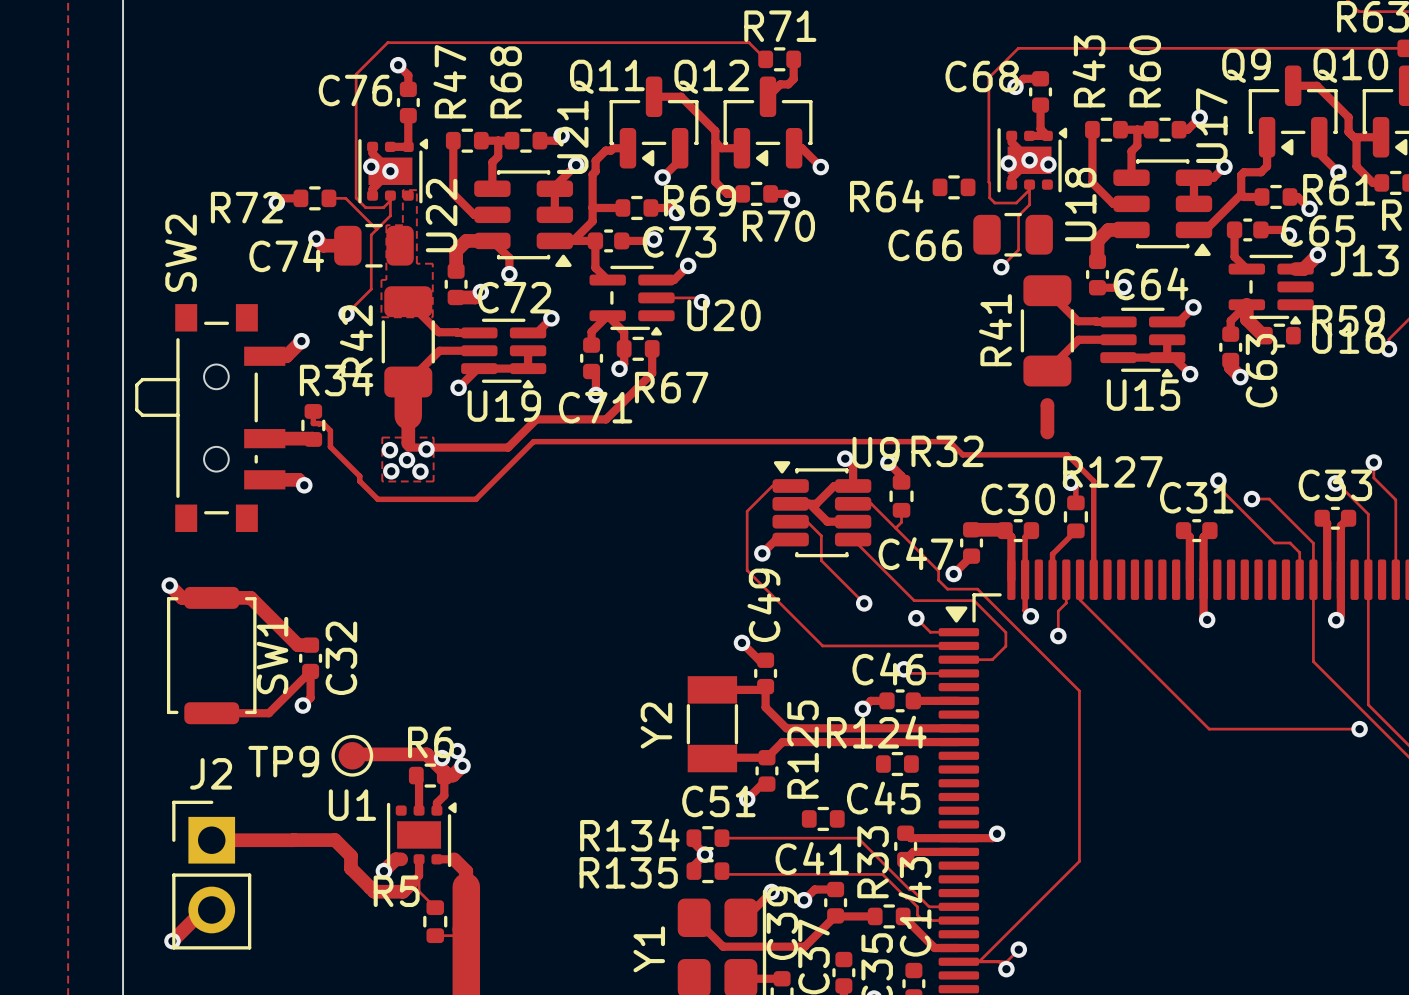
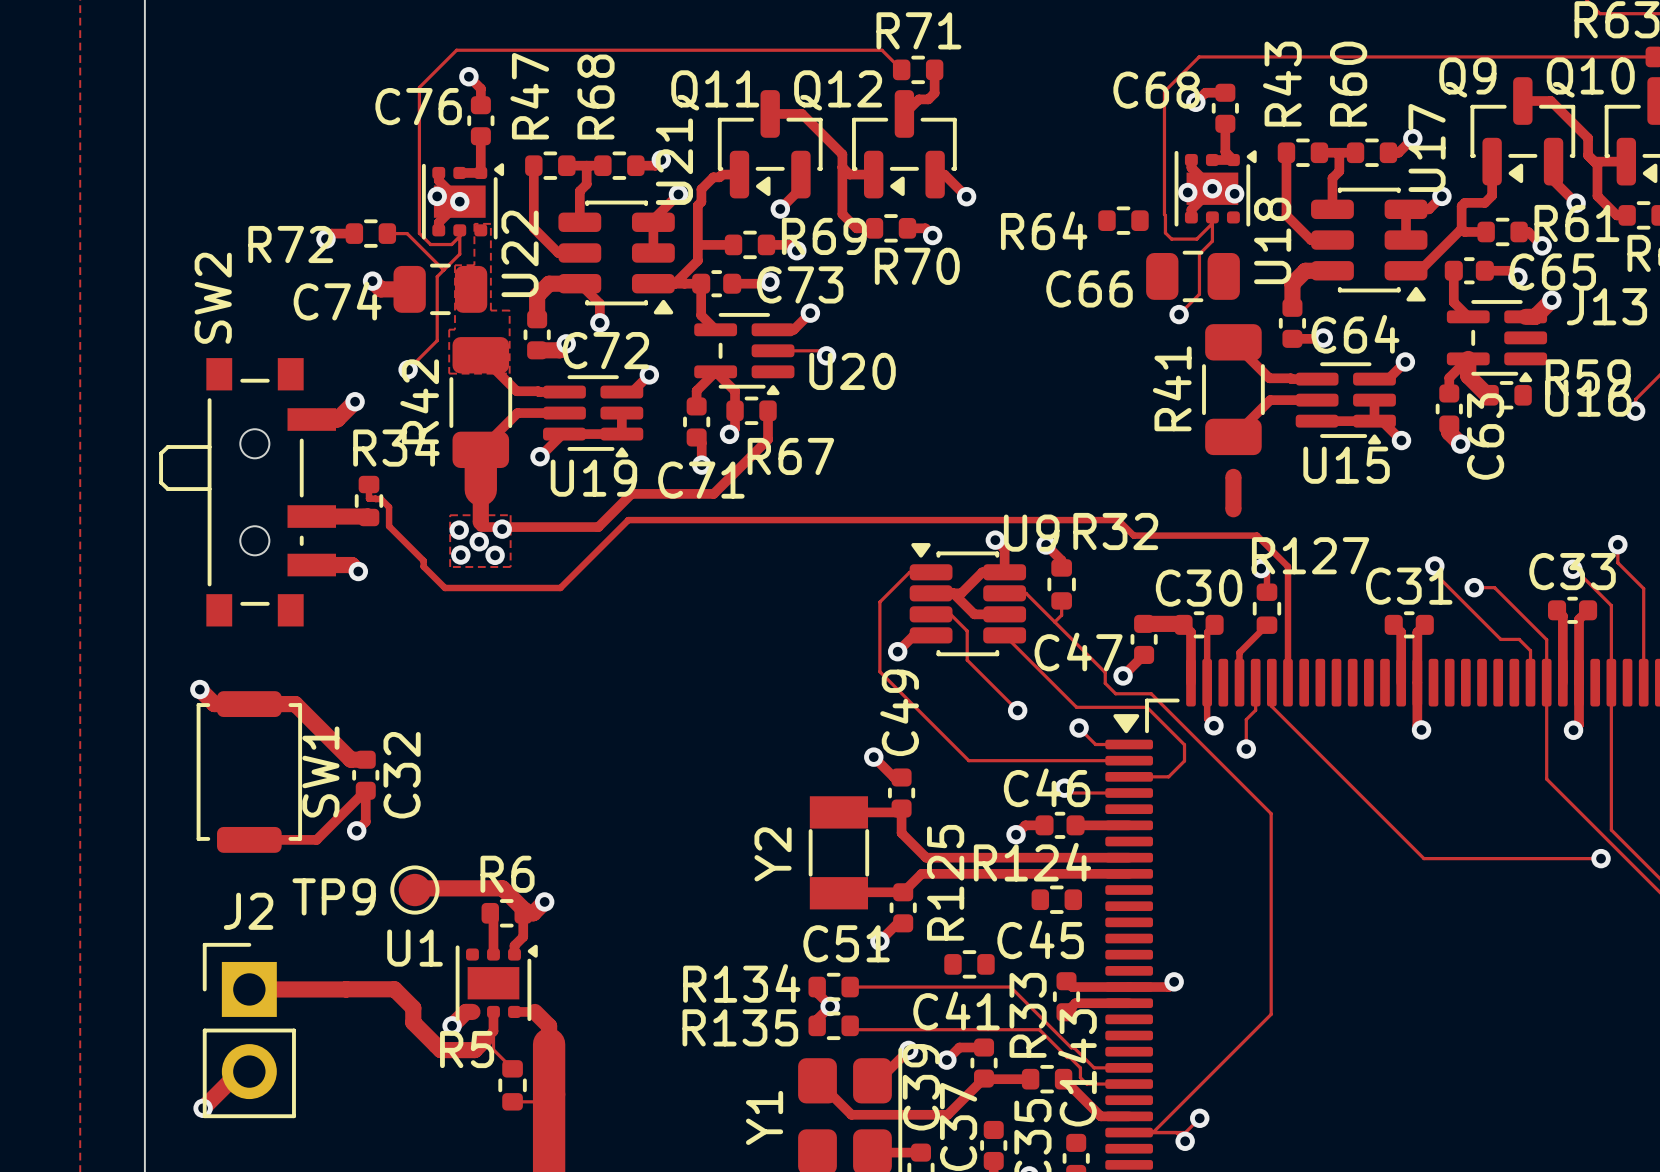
via: (457, 751) -> none
via: (442, 758) -> none

